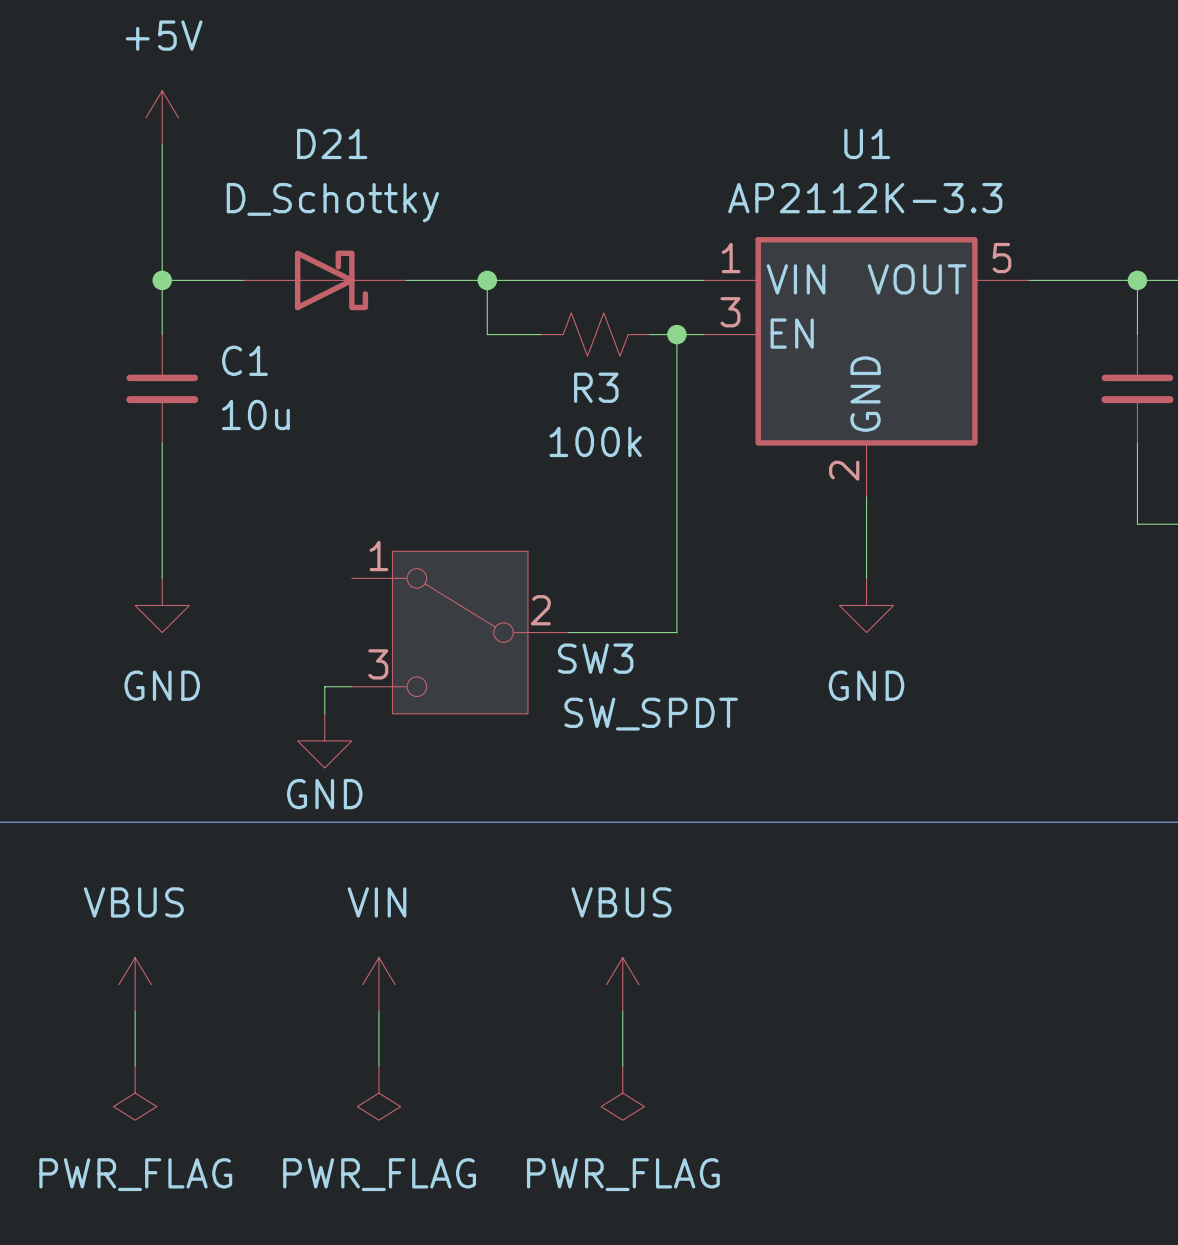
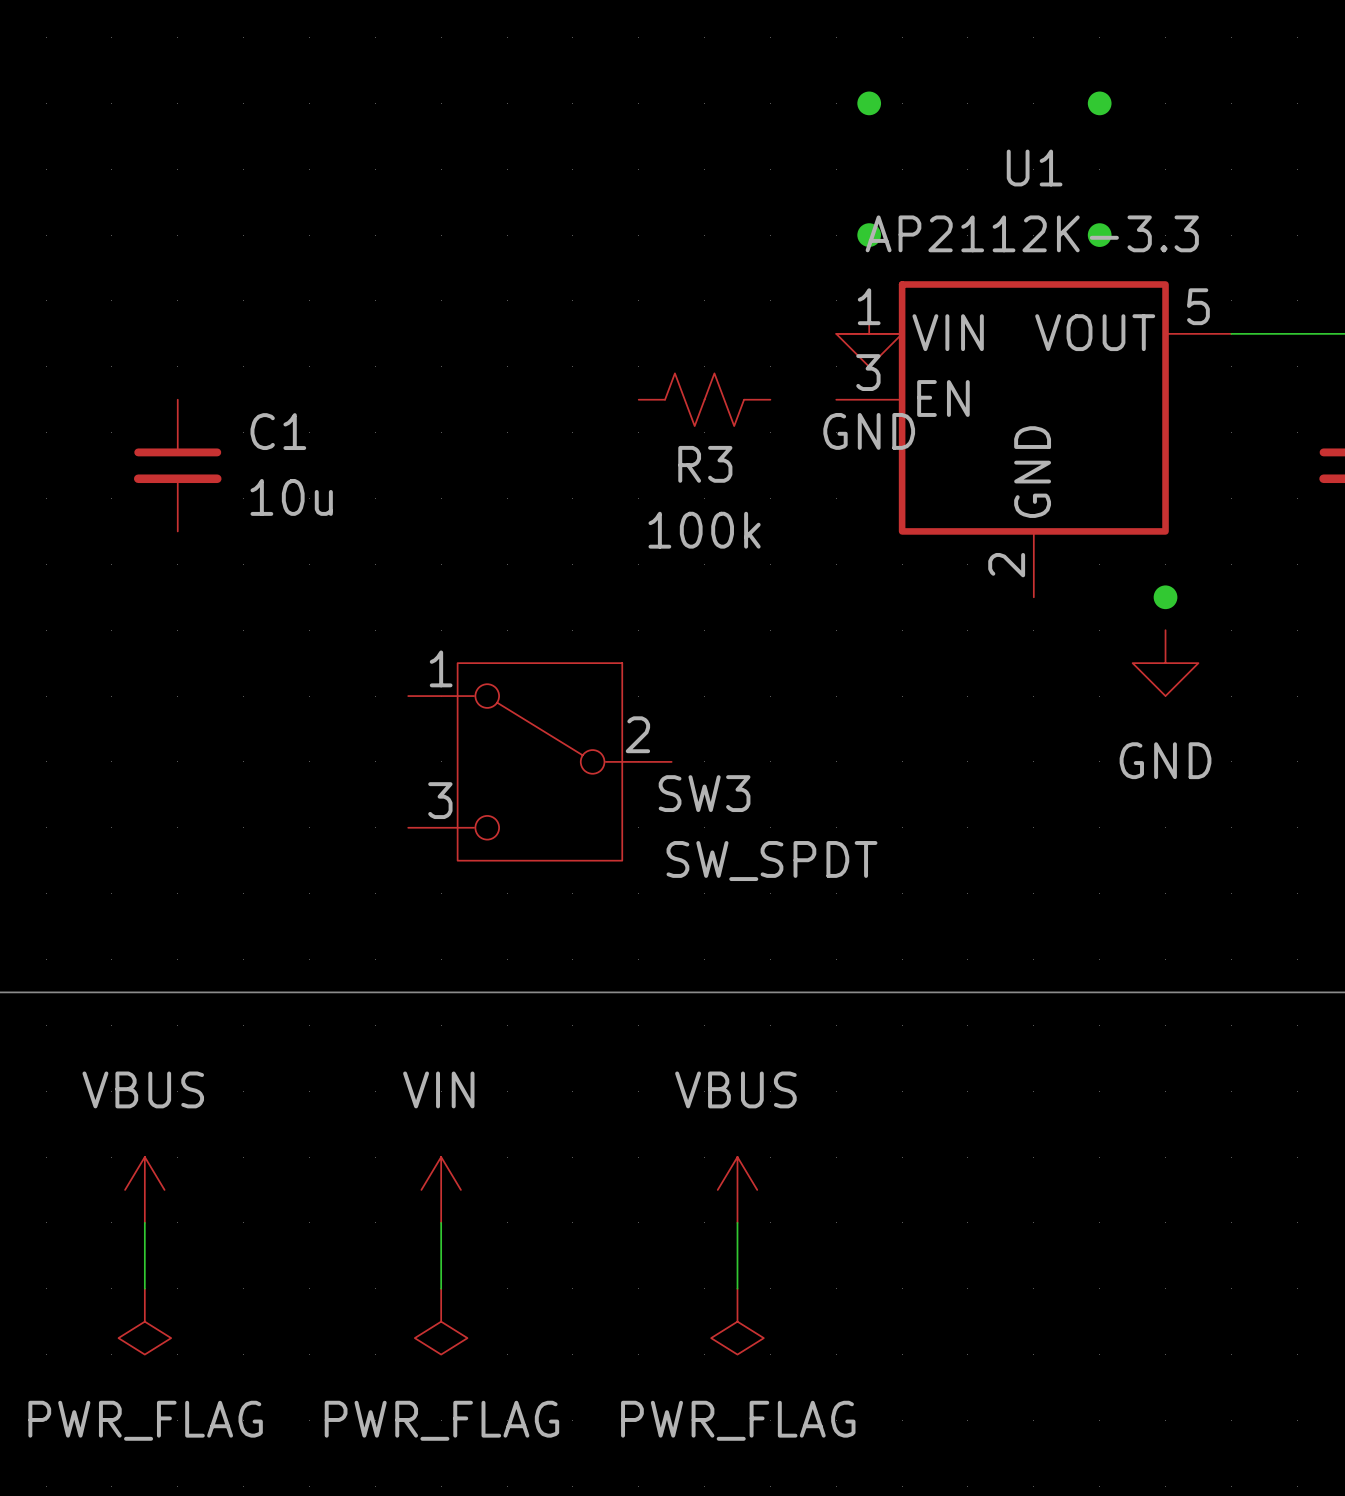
junction: none -> (869, 103)
junction: none -> (1099, 103)
power symbol: +5V (162, 117) -> none
wire: (162, 144) (162, 334) -> none
junction: none -> (869, 235)
junction: none -> (1099, 235)
wire: (162, 280) (243, 280) -> none
junction: (162, 280) -> none
D21: D_Schottky (324, 280) -> none
wire: (406, 280) (704, 280) -> none
wire: (487, 280) (487, 334) (541, 334) -> none
junction: (487, 280) -> none
power symbol: none -> GND (869, 333)
wire: (649, 334) (704, 334) -> none
wire: (676, 334) (676, 632) (568, 632) -> none
junction: (676, 334) -> none
wire: (162, 442) (162, 578) -> none
wire: (866, 497) (866, 578) -> none
junction: none -> (1165, 597)
power symbol: GND (162, 605) -> none
power symbol position: GND (866, 605) -> GND (1165, 663)
wire: (351, 686) (324, 686) (324, 713) -> none
power symbol: GND (324, 740) -> none

